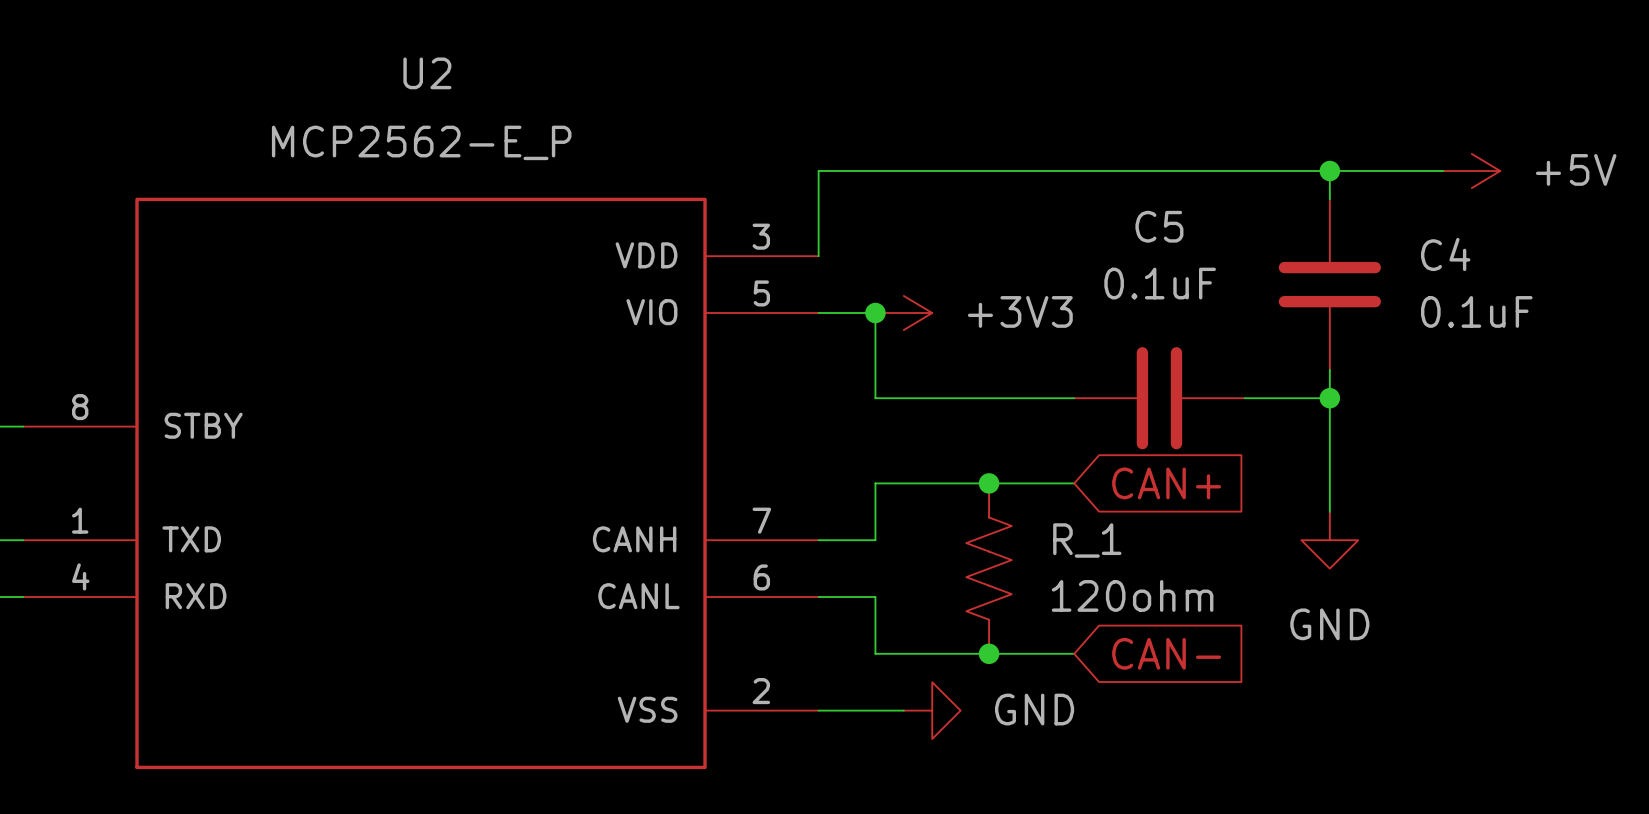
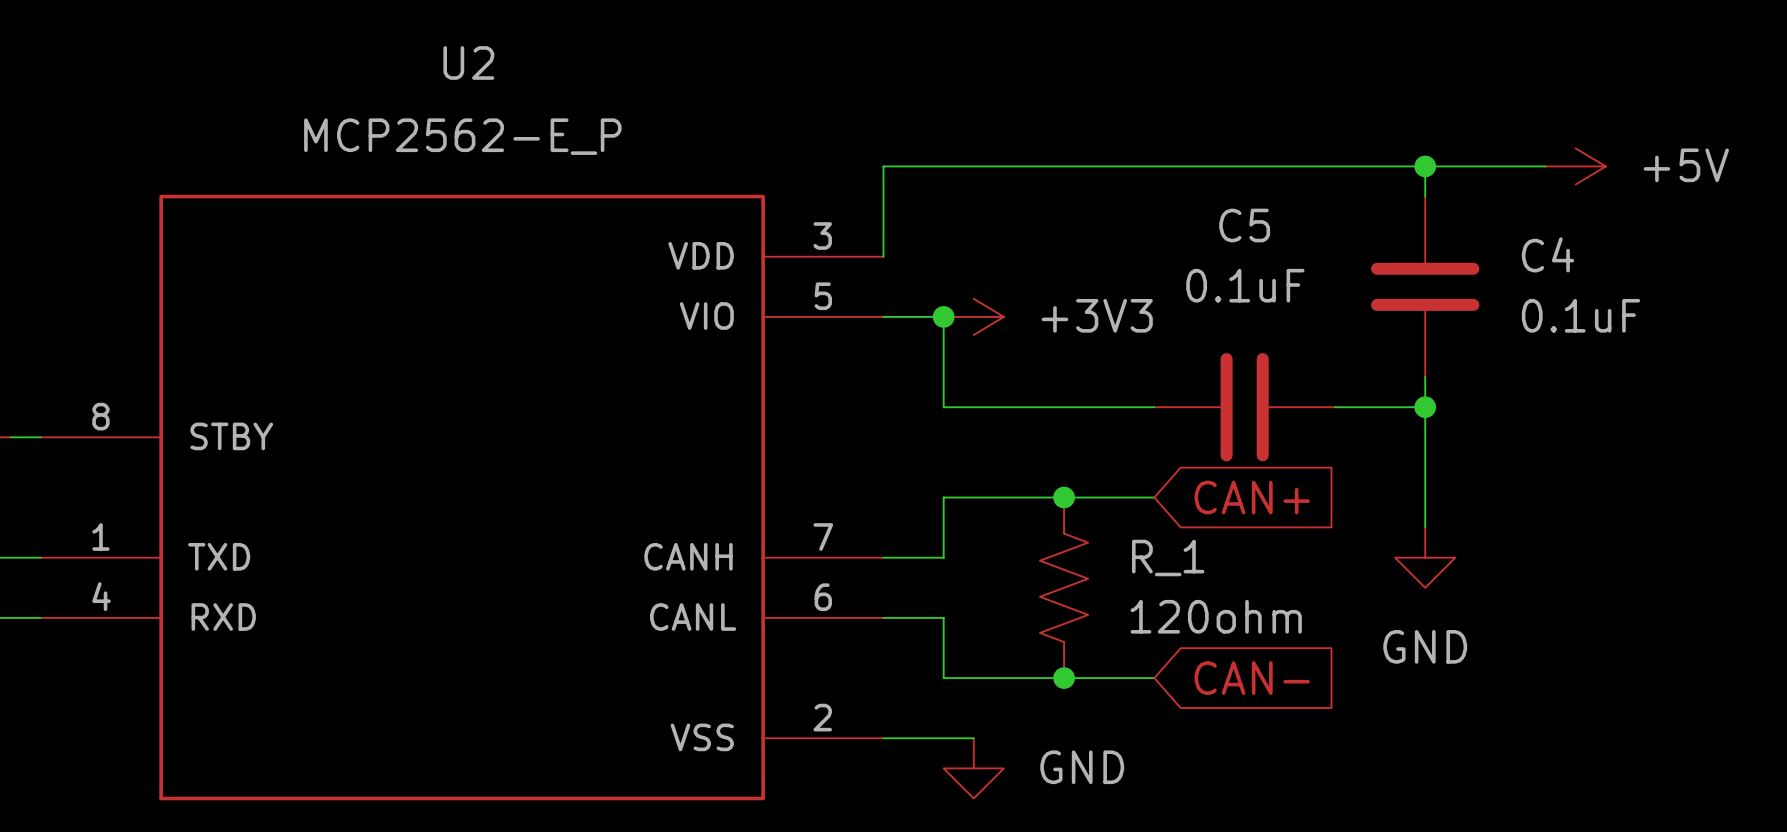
power symbol rotation: 0° (932, 710) -> 90° clockwise (973, 768)
power symbol position: GND (932, 710) -> GND (973, 768)

